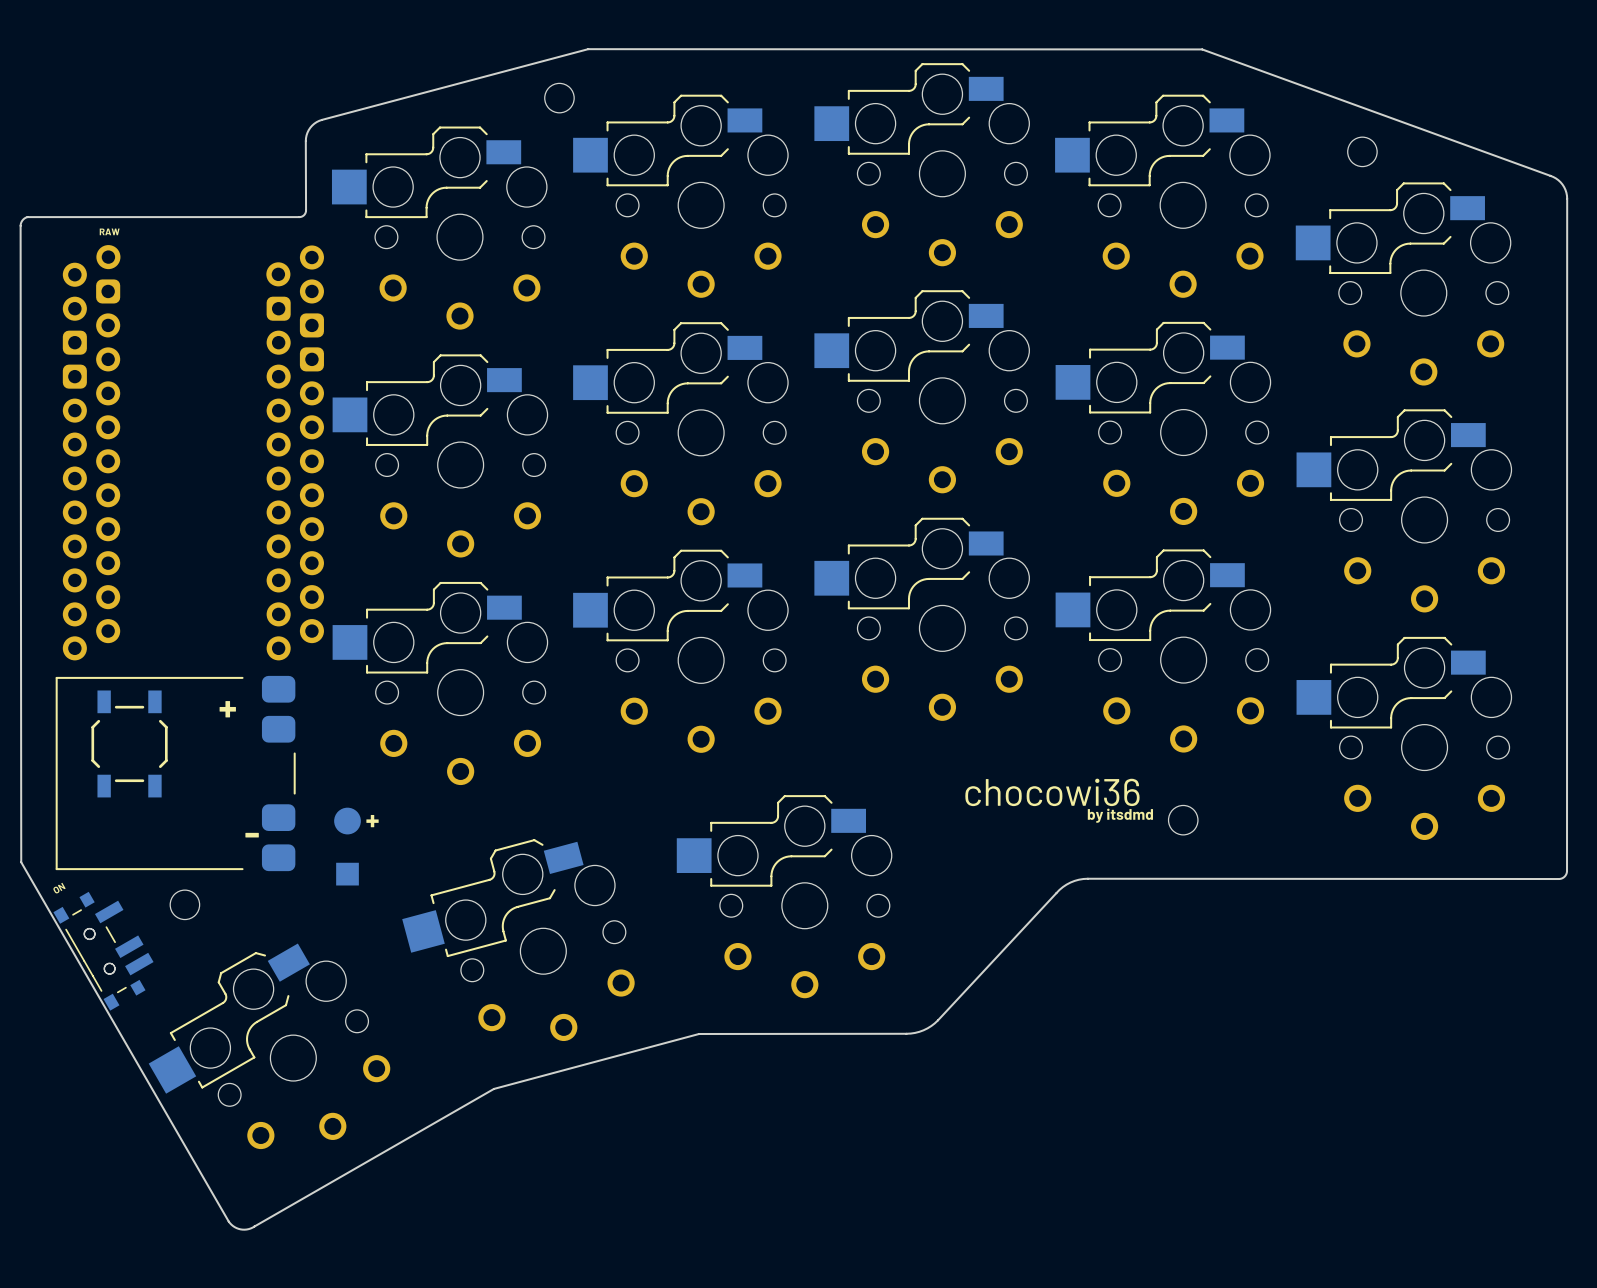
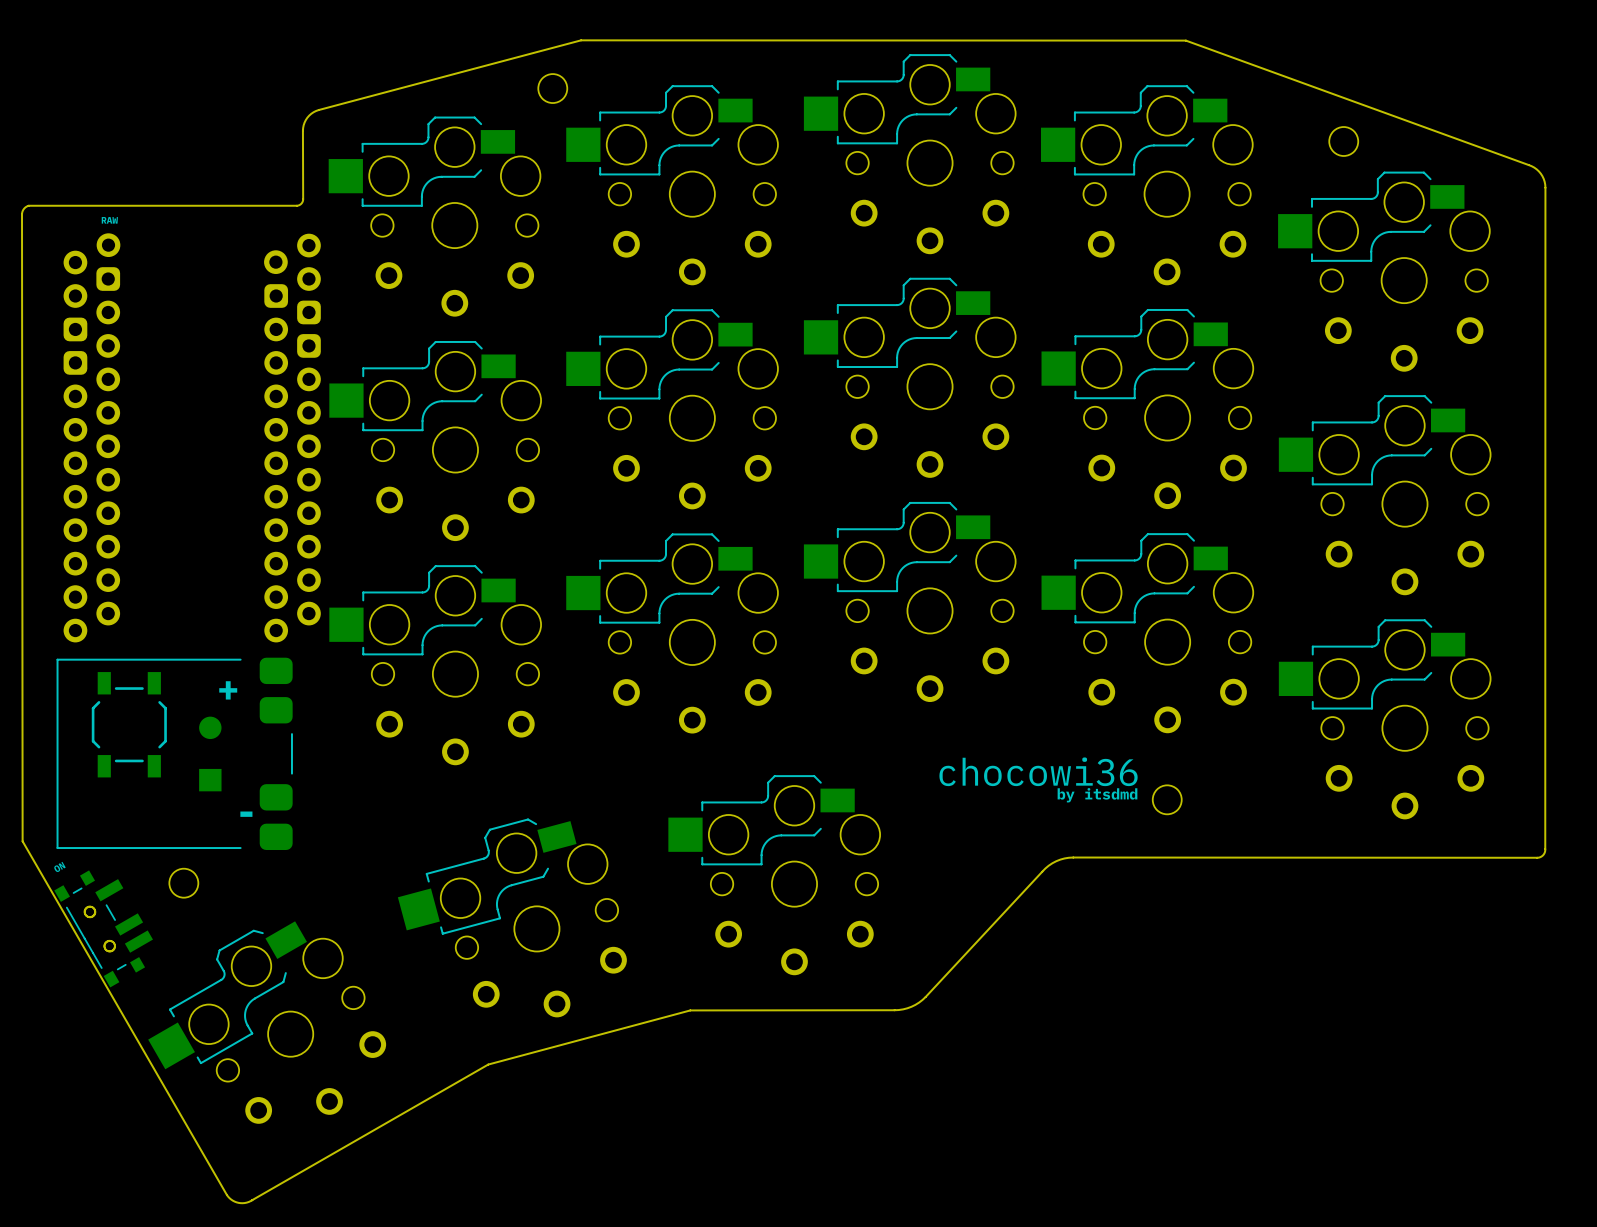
part: none -> (210, 753)
text: + (372, 821) -> none
part: (347, 846) -> none

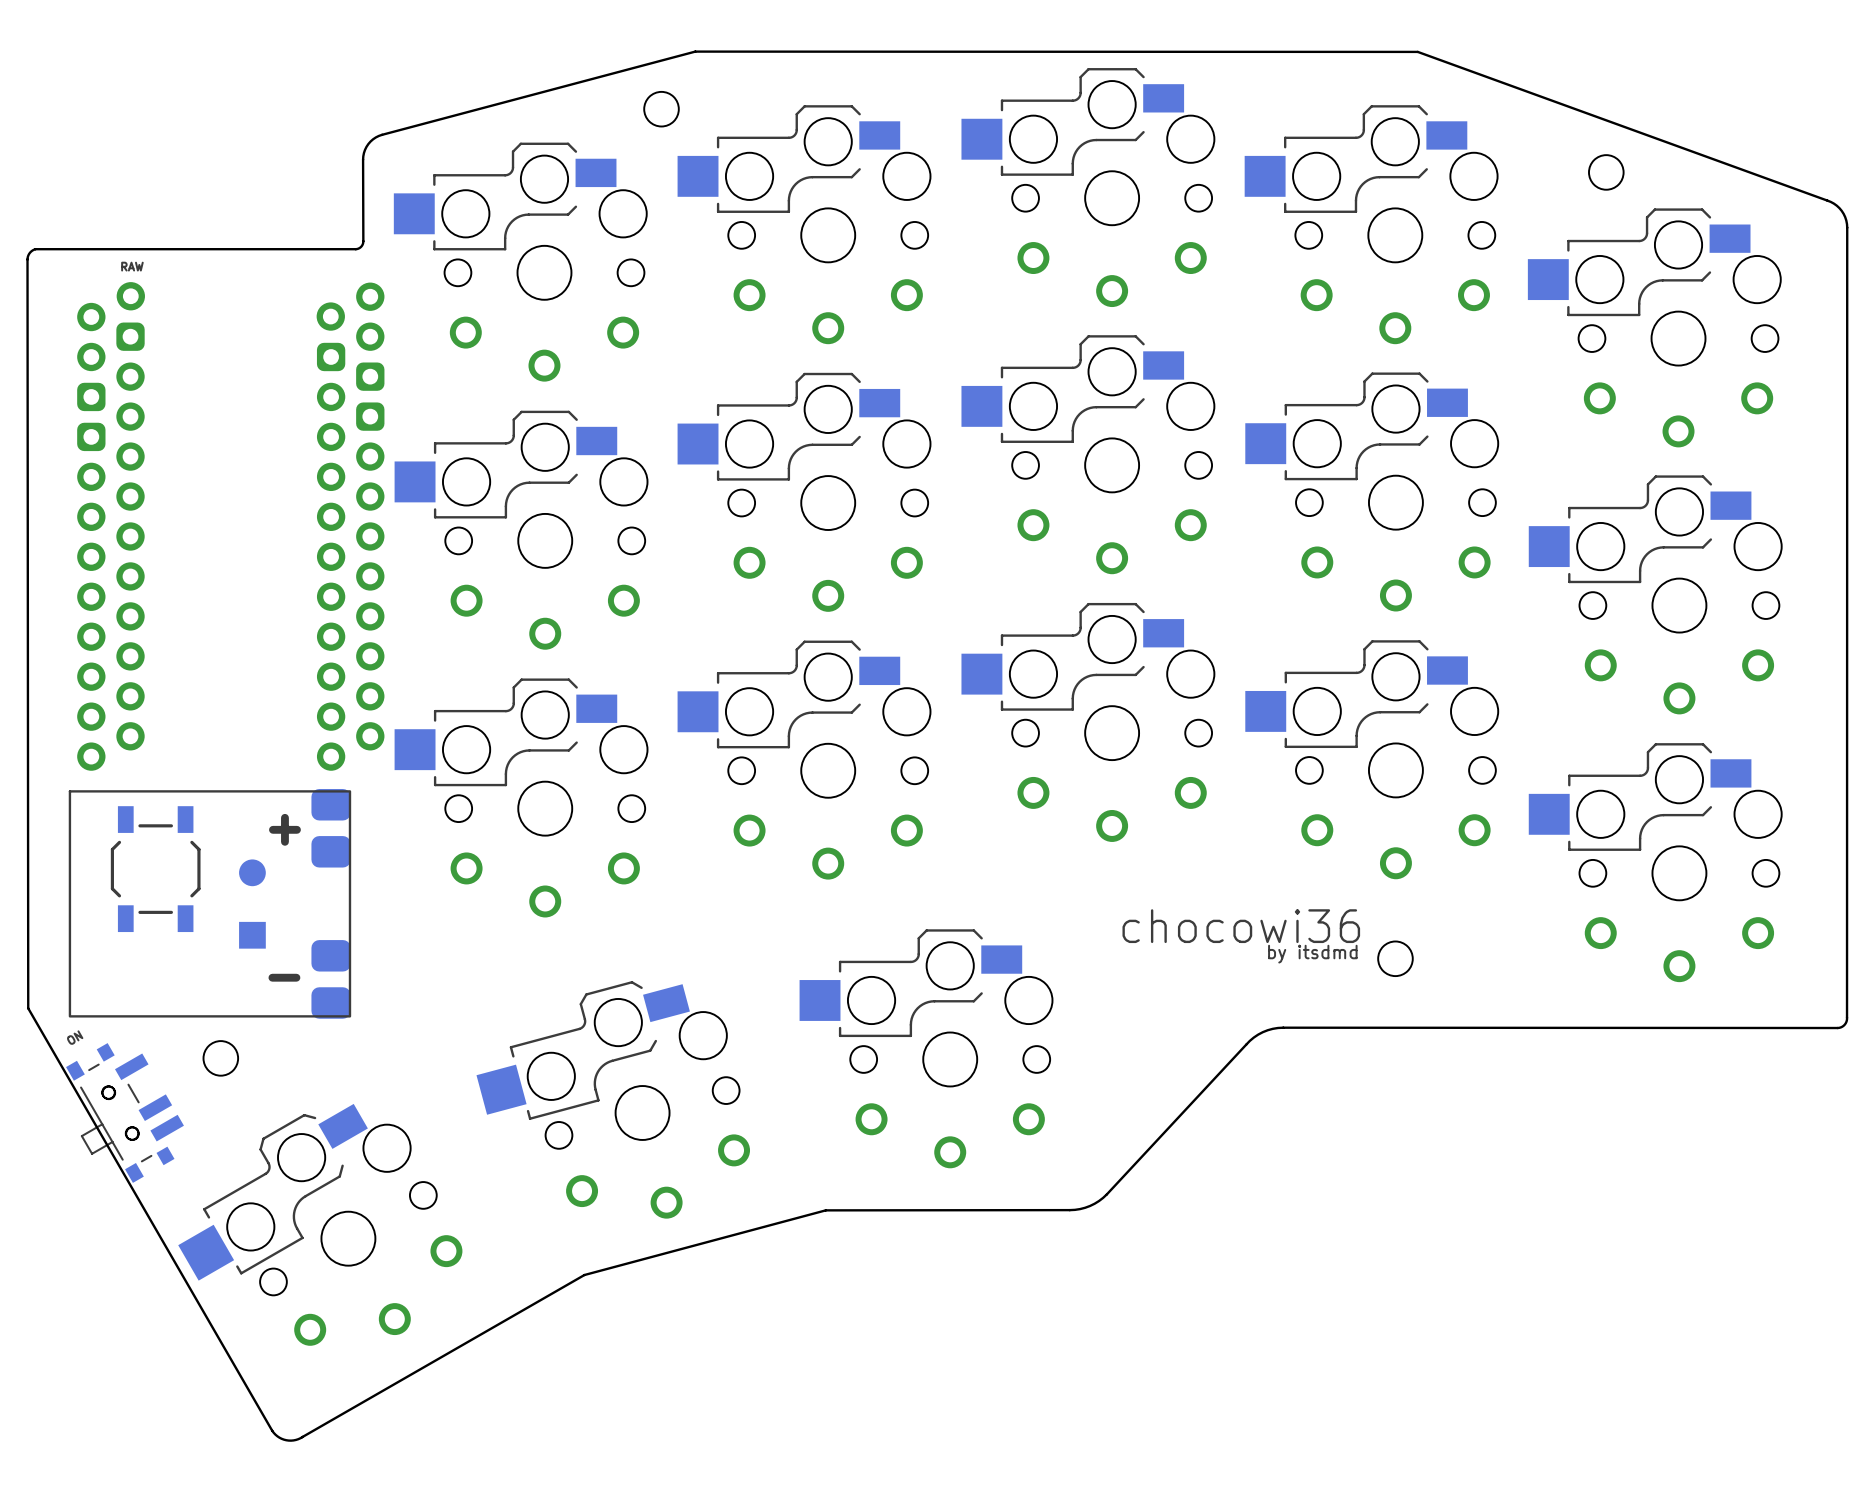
part footprint: [56, 657, 293, 851] -> [68, 789, 352, 1019]
part footprint: [54, 870, 153, 988] -> [66, 1043, 184, 1183]

